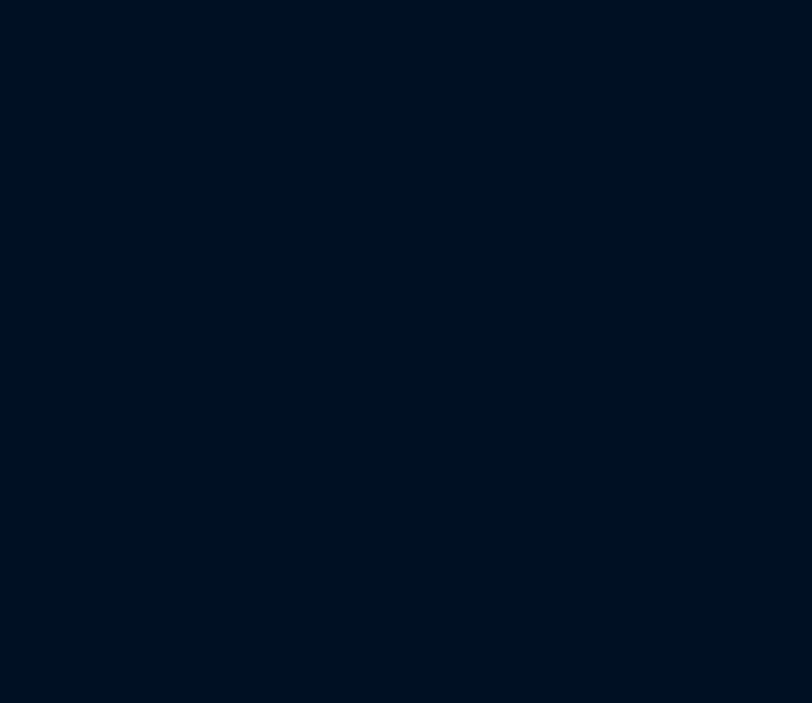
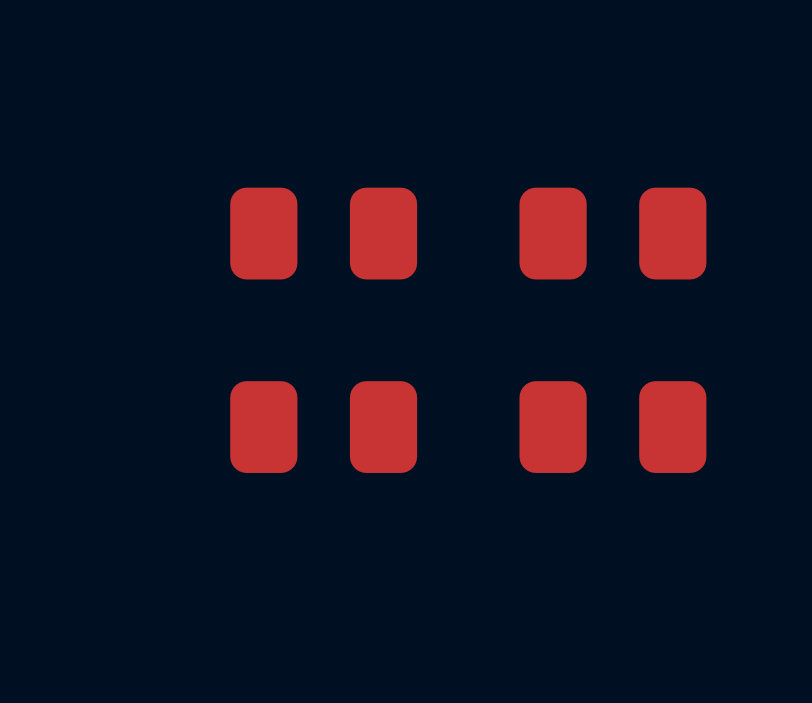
part: none -> (323, 233)
part: none -> (612, 233)
part: none -> (323, 427)
part: none -> (612, 427)

